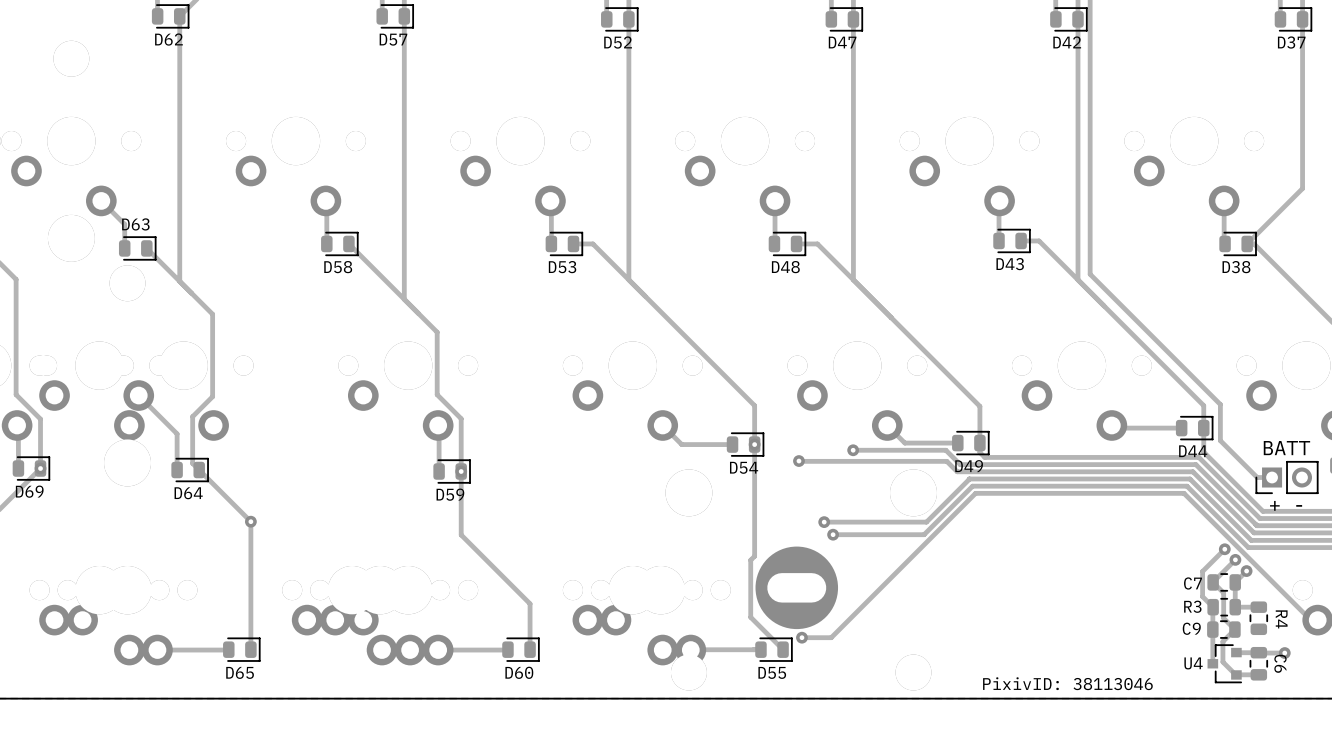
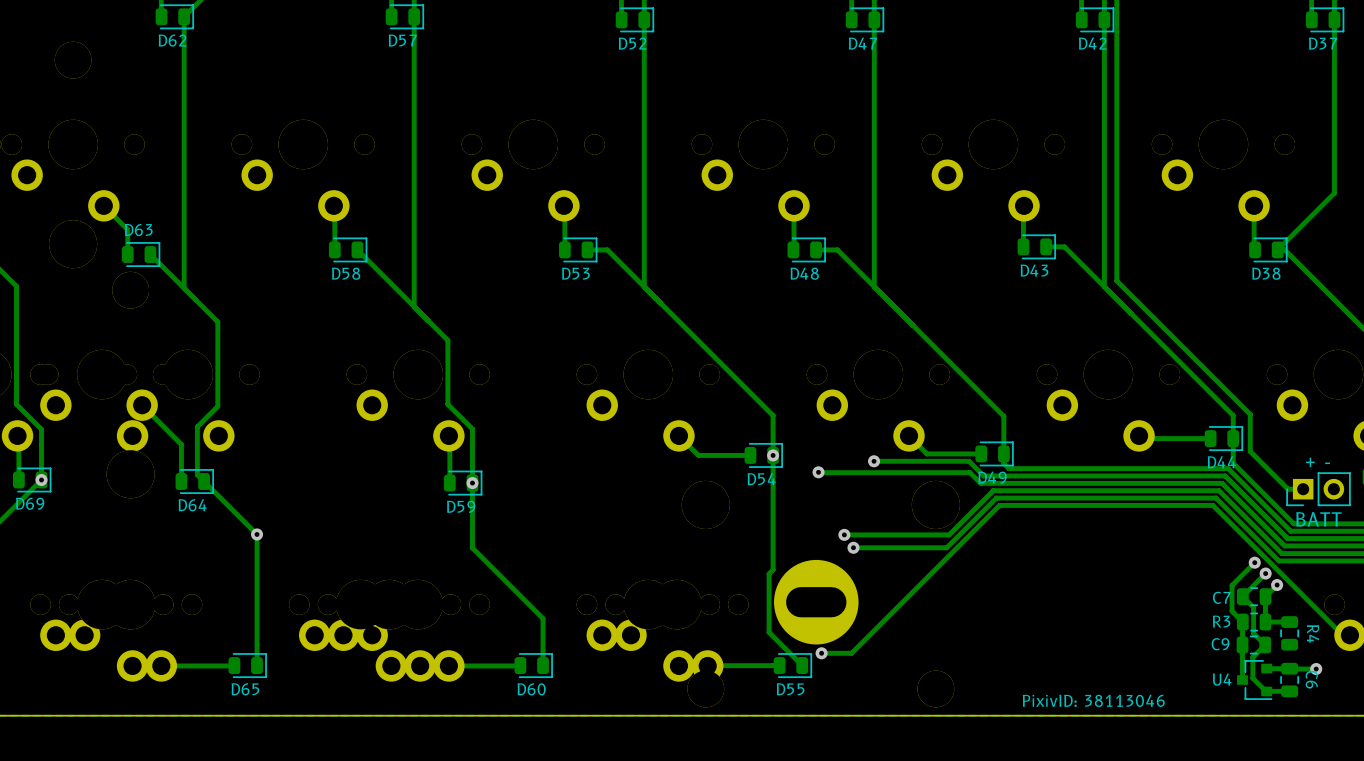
text: BATT (1286, 448) -> + - (1318, 462)
text: + - (1286, 505) -> BATT (1318, 519)

